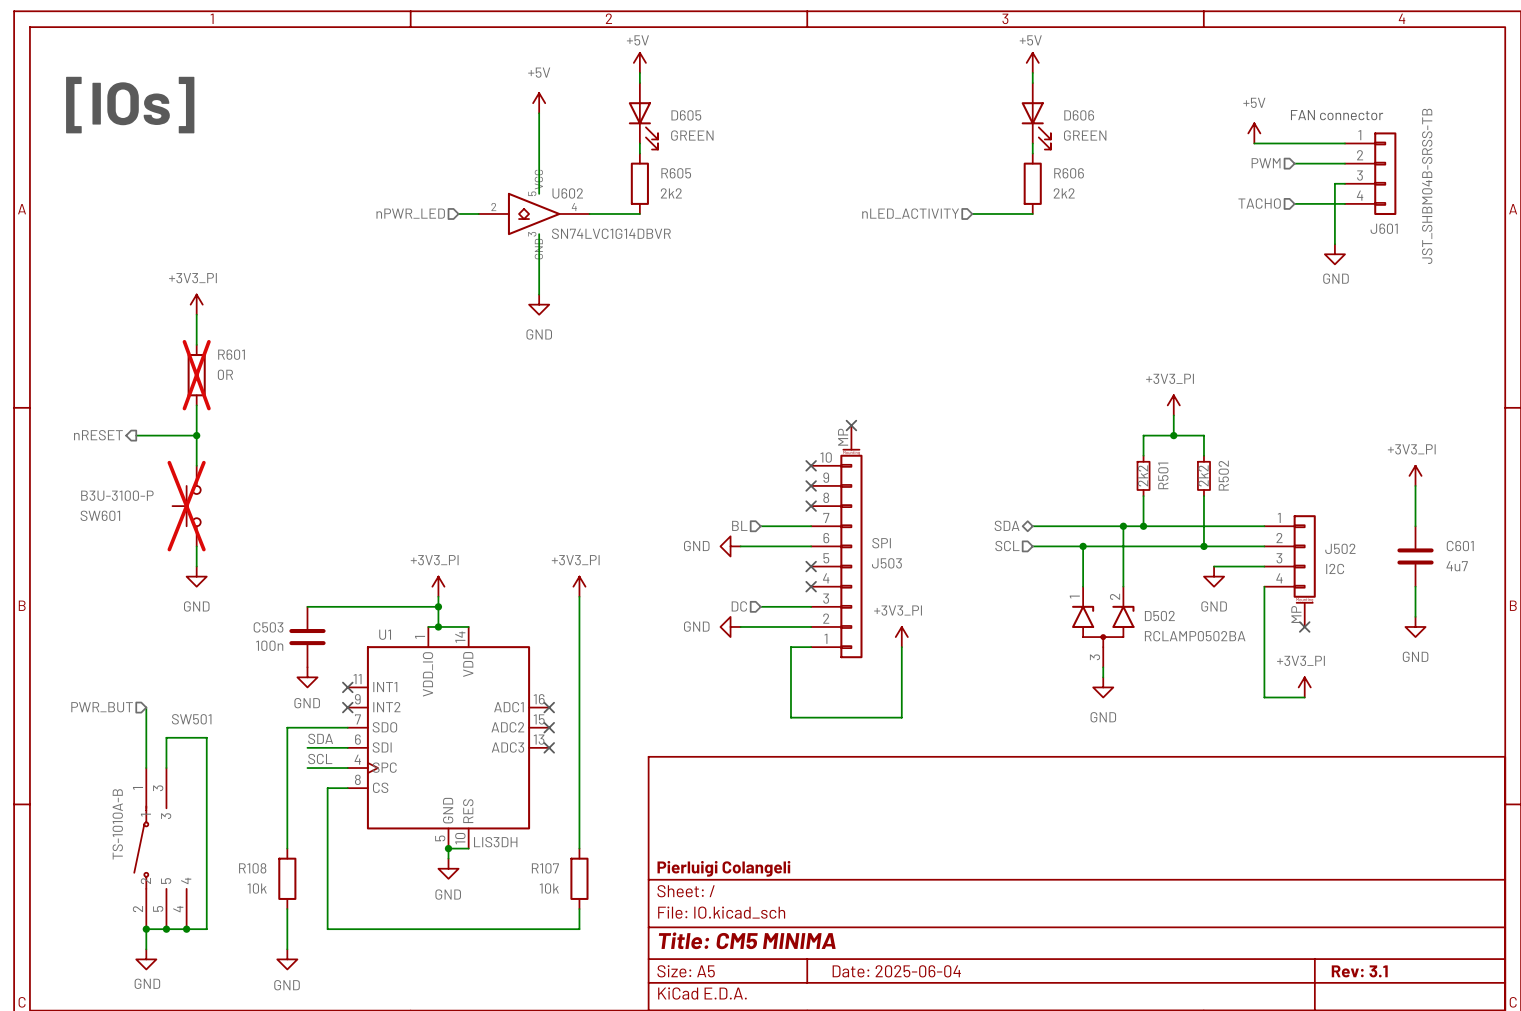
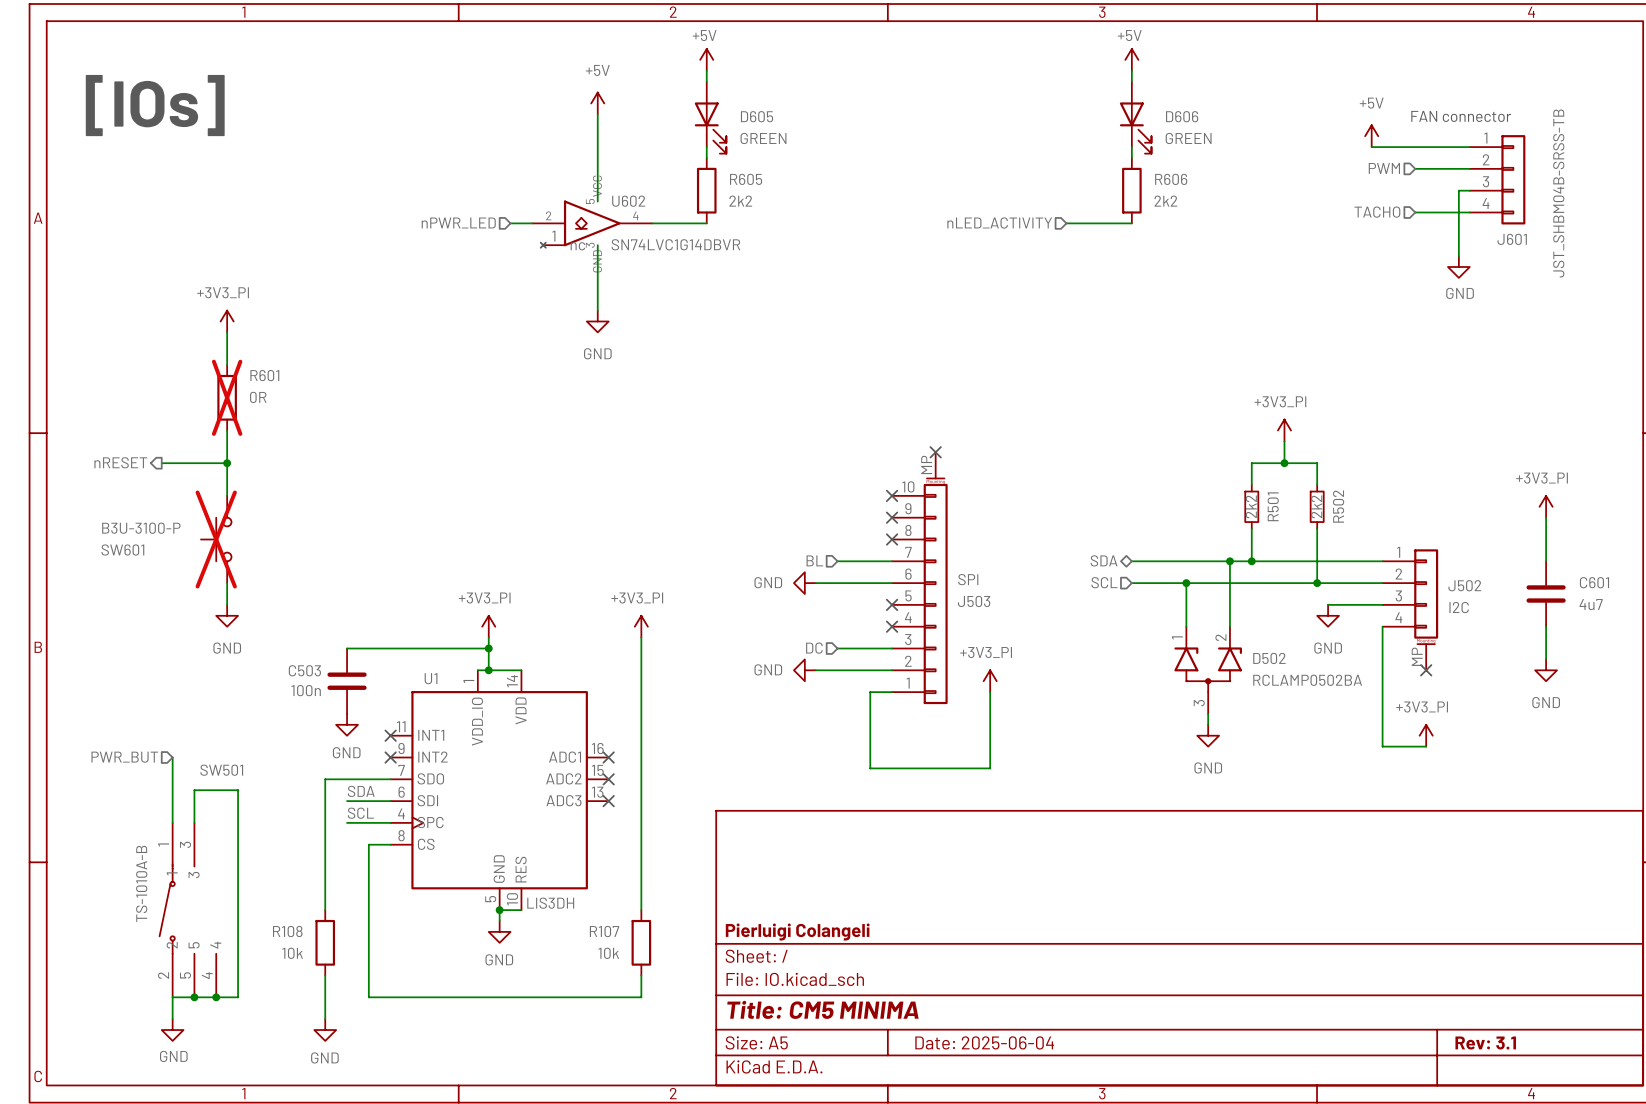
U602 symbol: [478, 192, 590, 236] -> [532, 200, 653, 248]
junction: (146, 929) -> none

